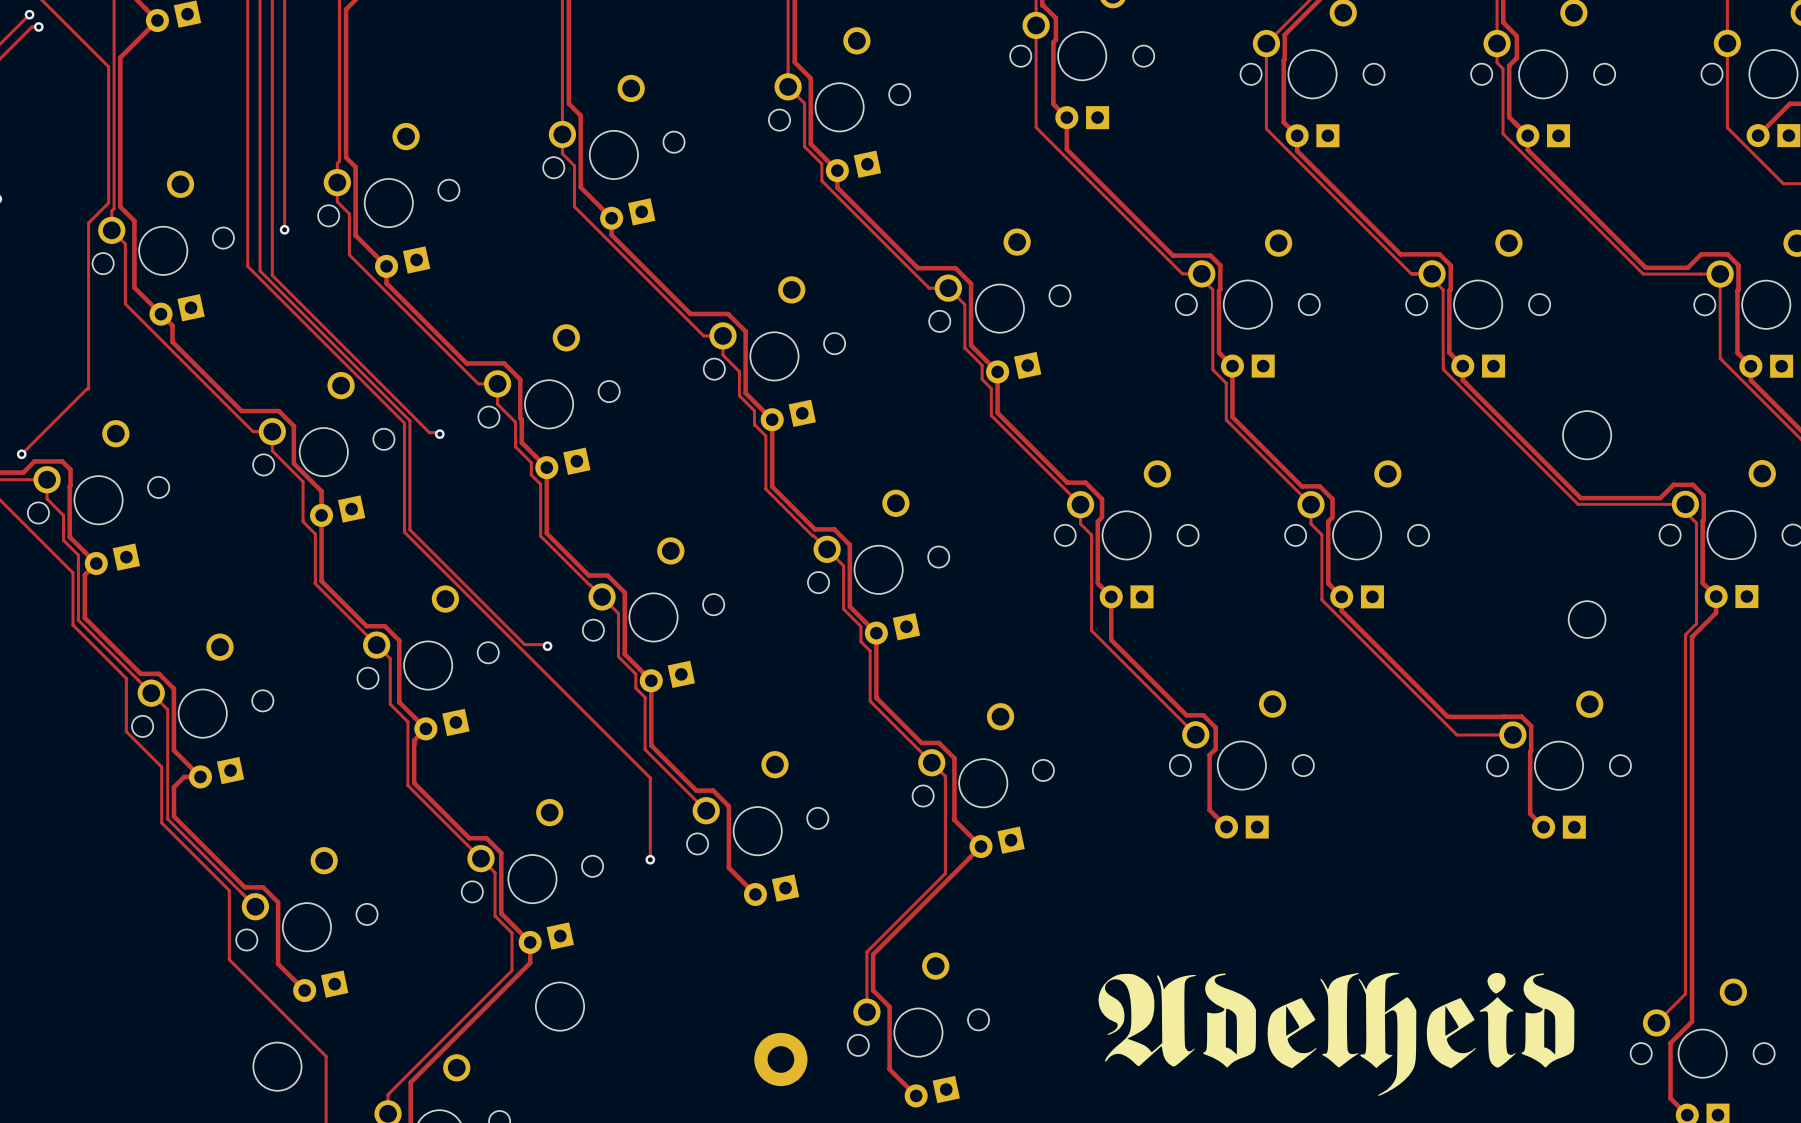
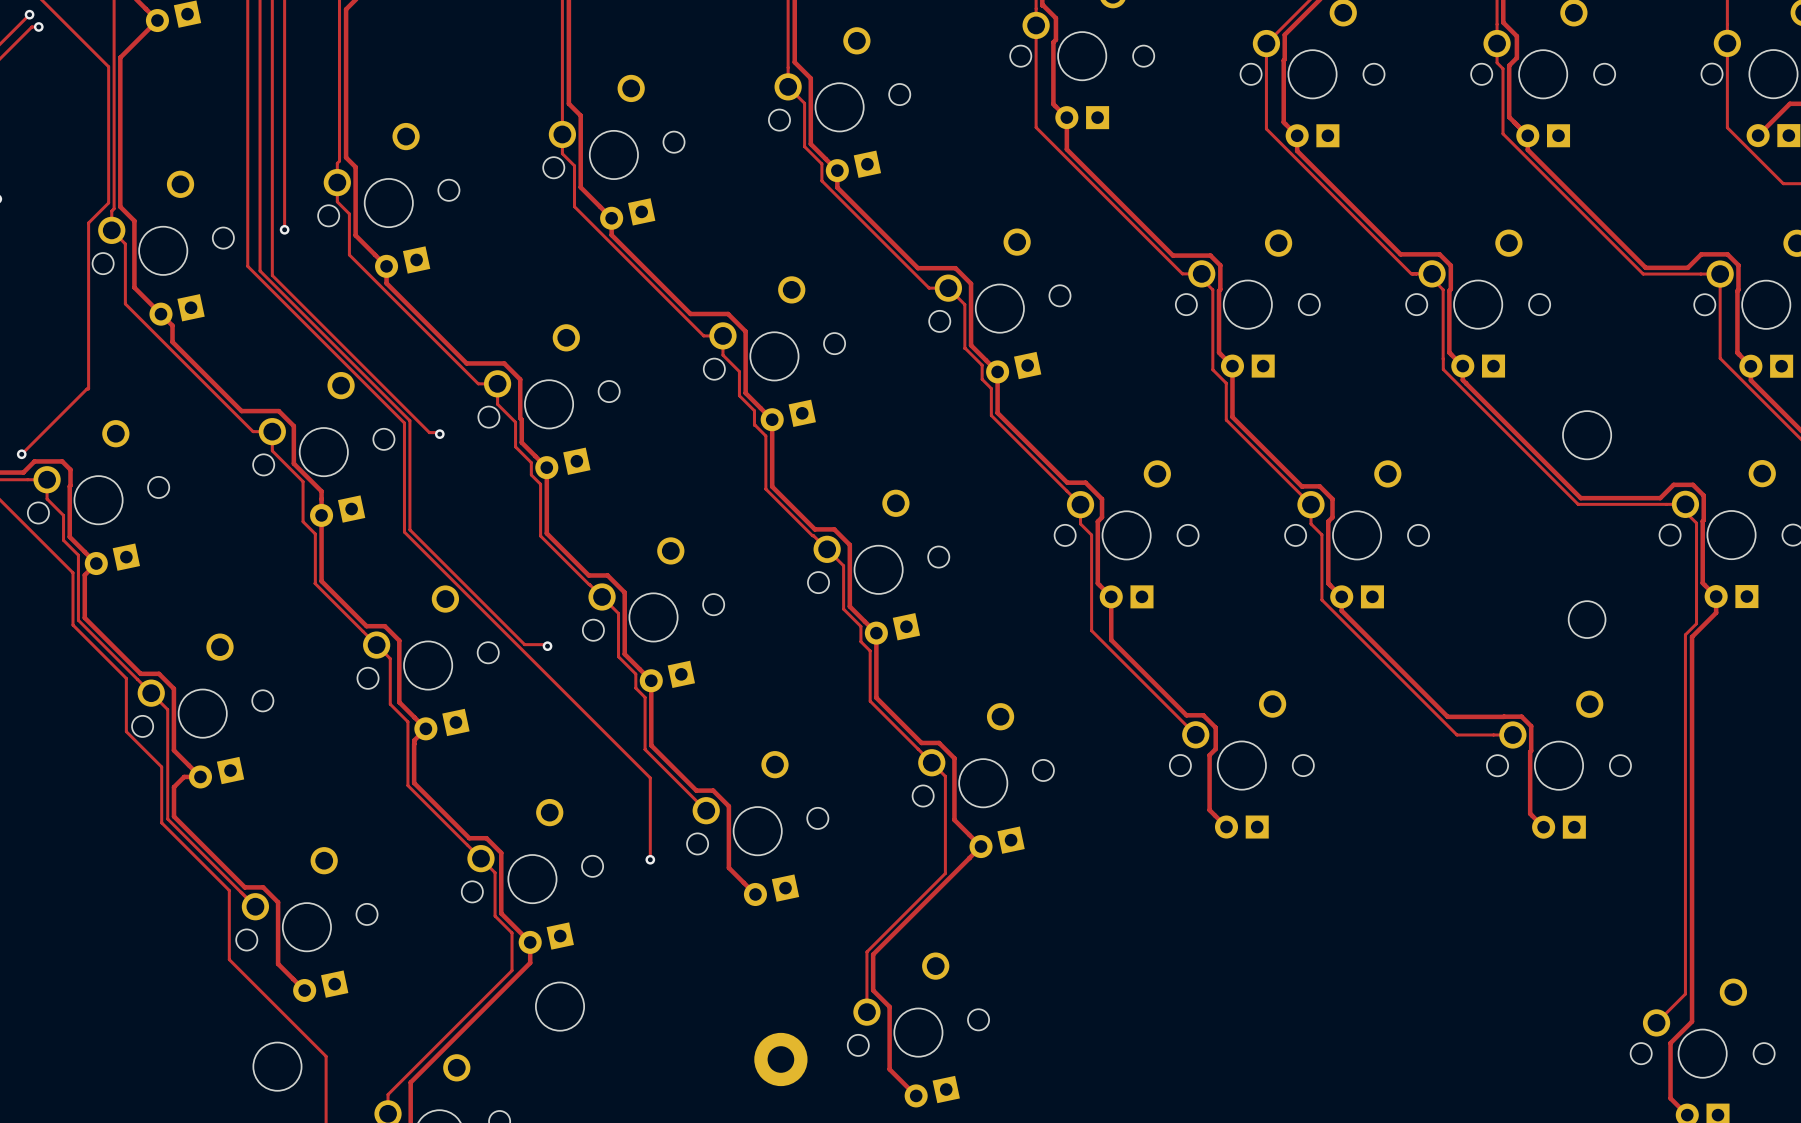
drawing: [1098, 972, 1575, 1096] -> none

